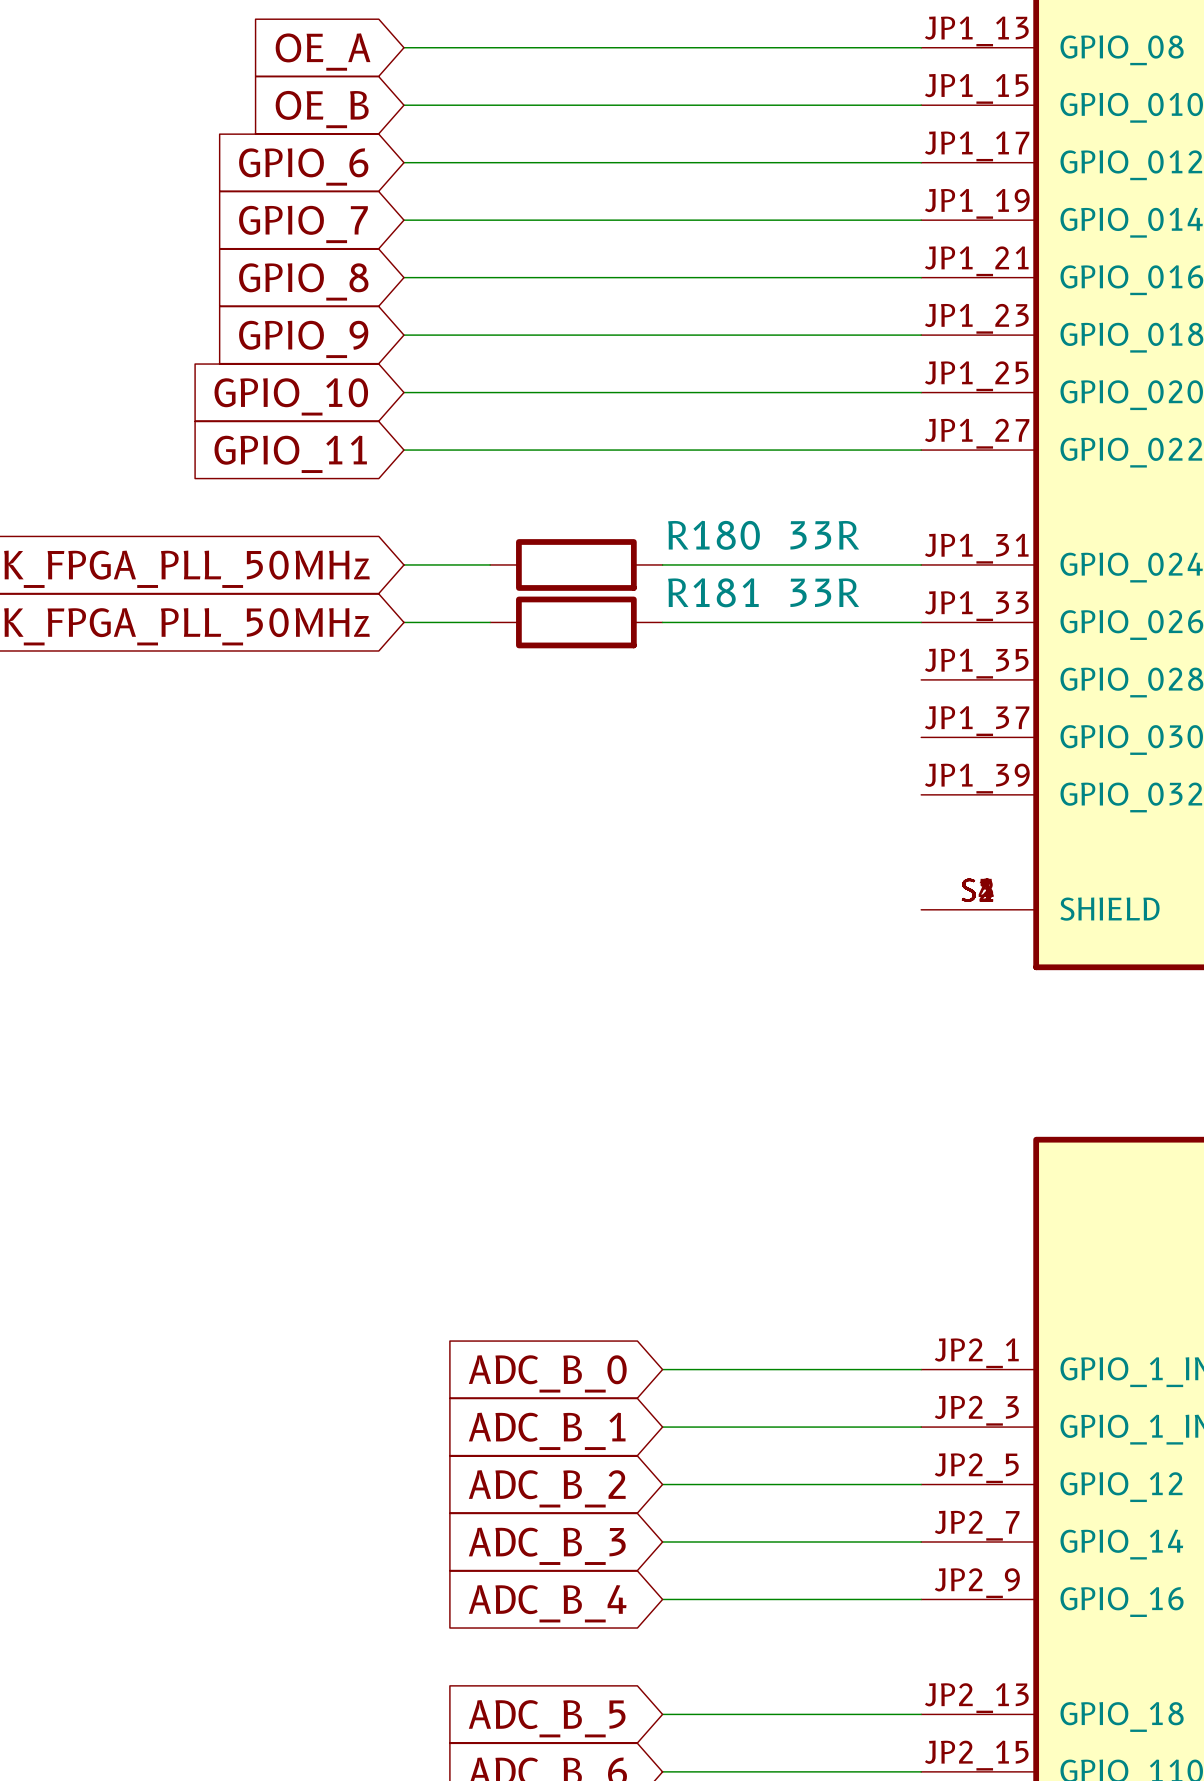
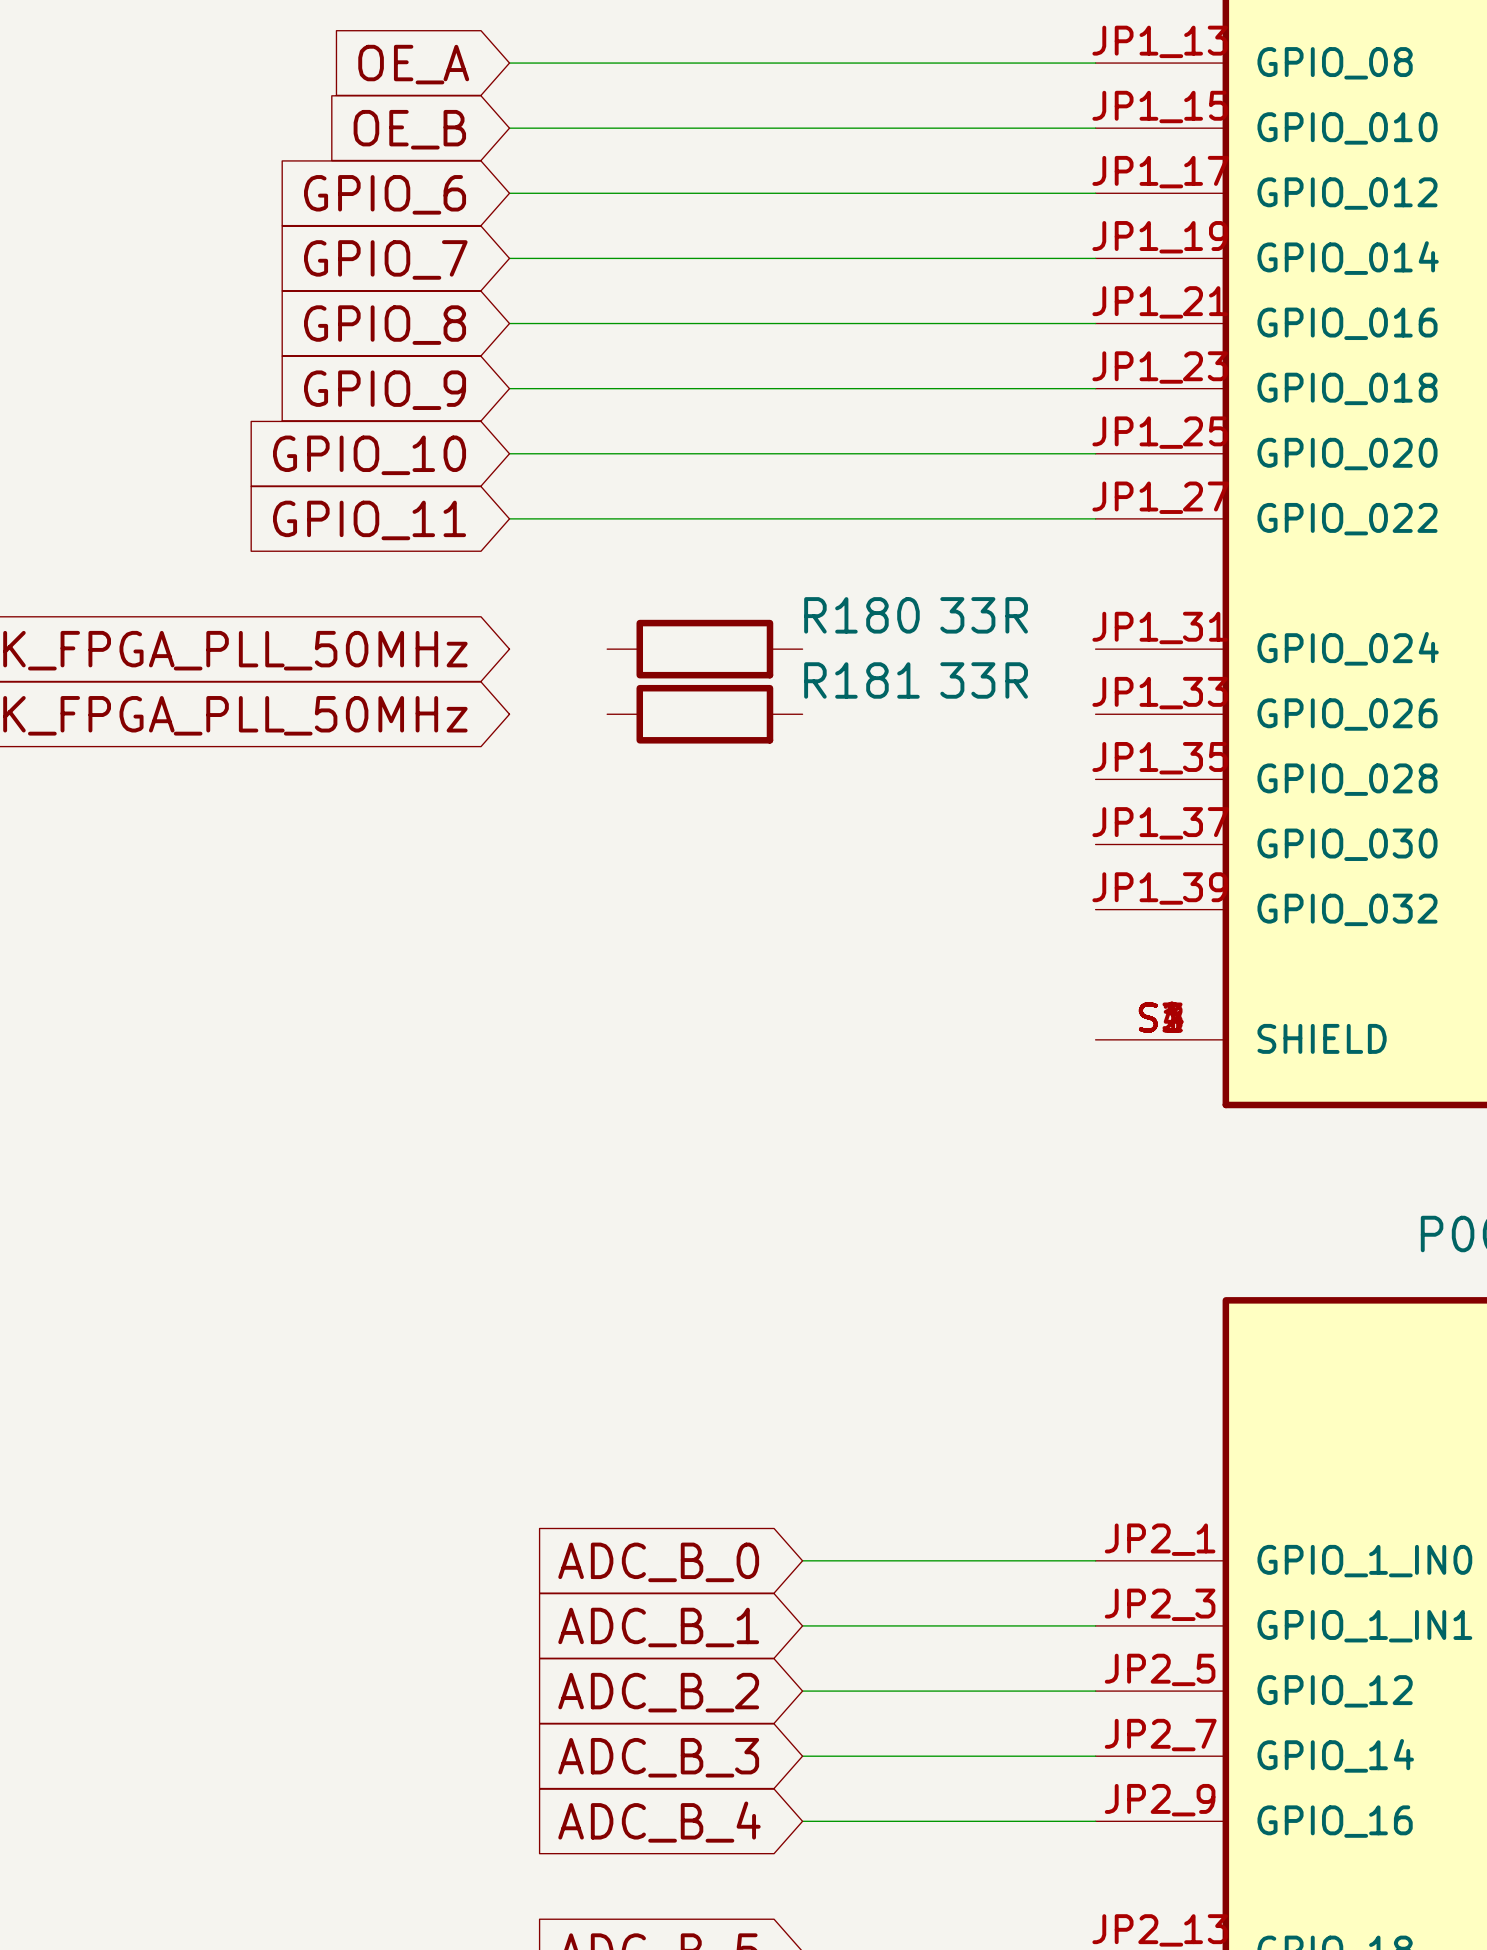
wire: (403, 564) (490, 564) -> none
wire: (662, 564) (921, 564) -> none
wire: (403, 622) (490, 622) -> none
wire: (662, 622) (921, 622) -> none

